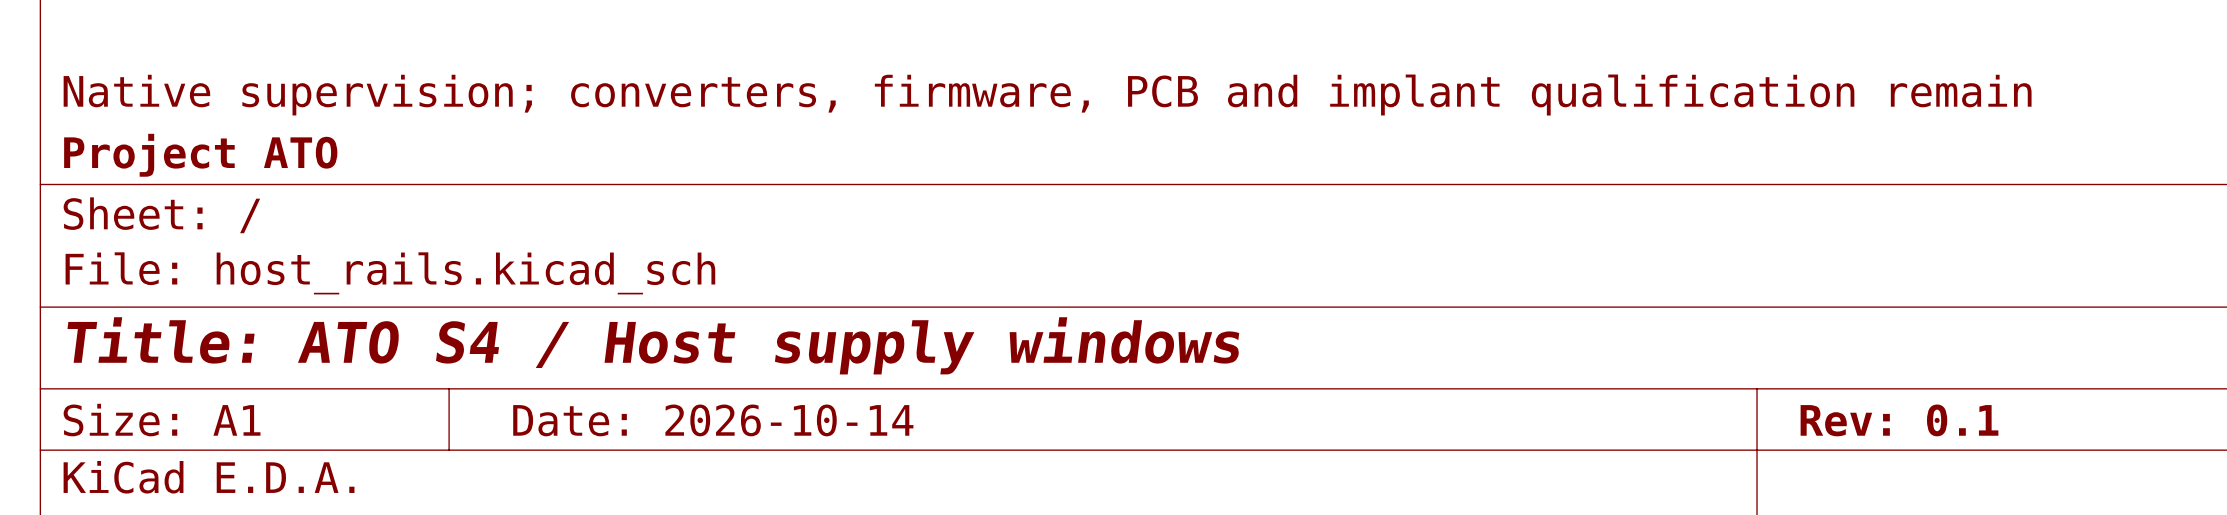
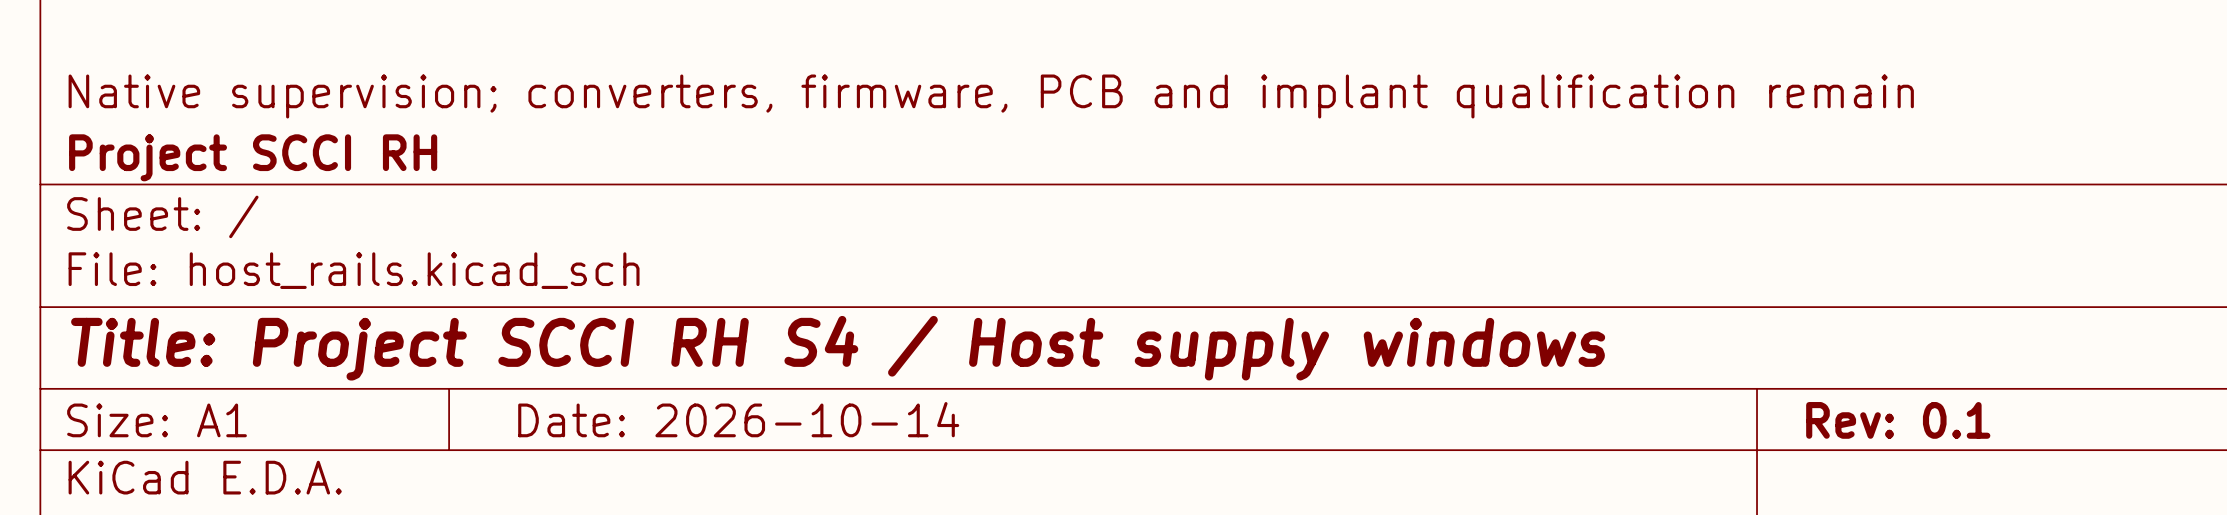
title block: Project ATO (200, 155) -> Project SCCI RH (253, 157)
title block: Title: ATO S4 / Host supply windows (653, 345) -> Title: Project SCCI RH S4 / Host supply windows (838, 348)

